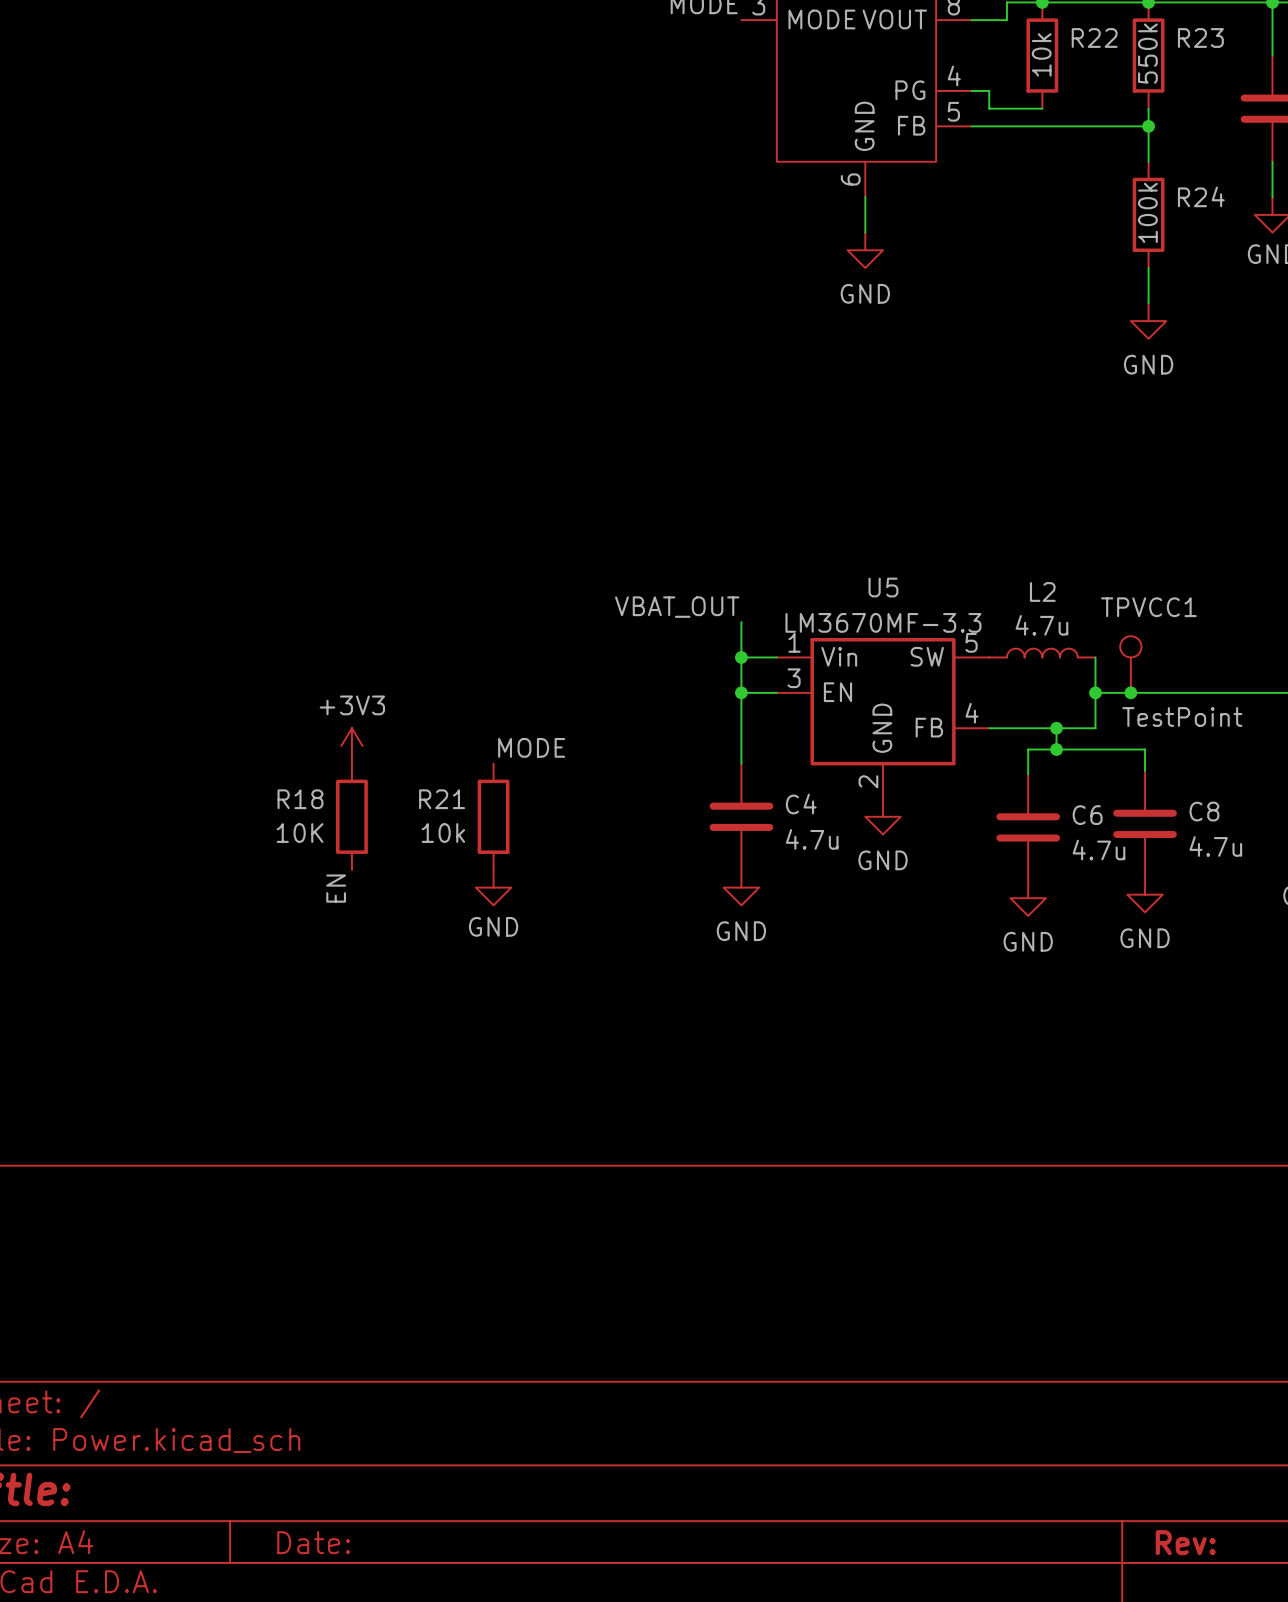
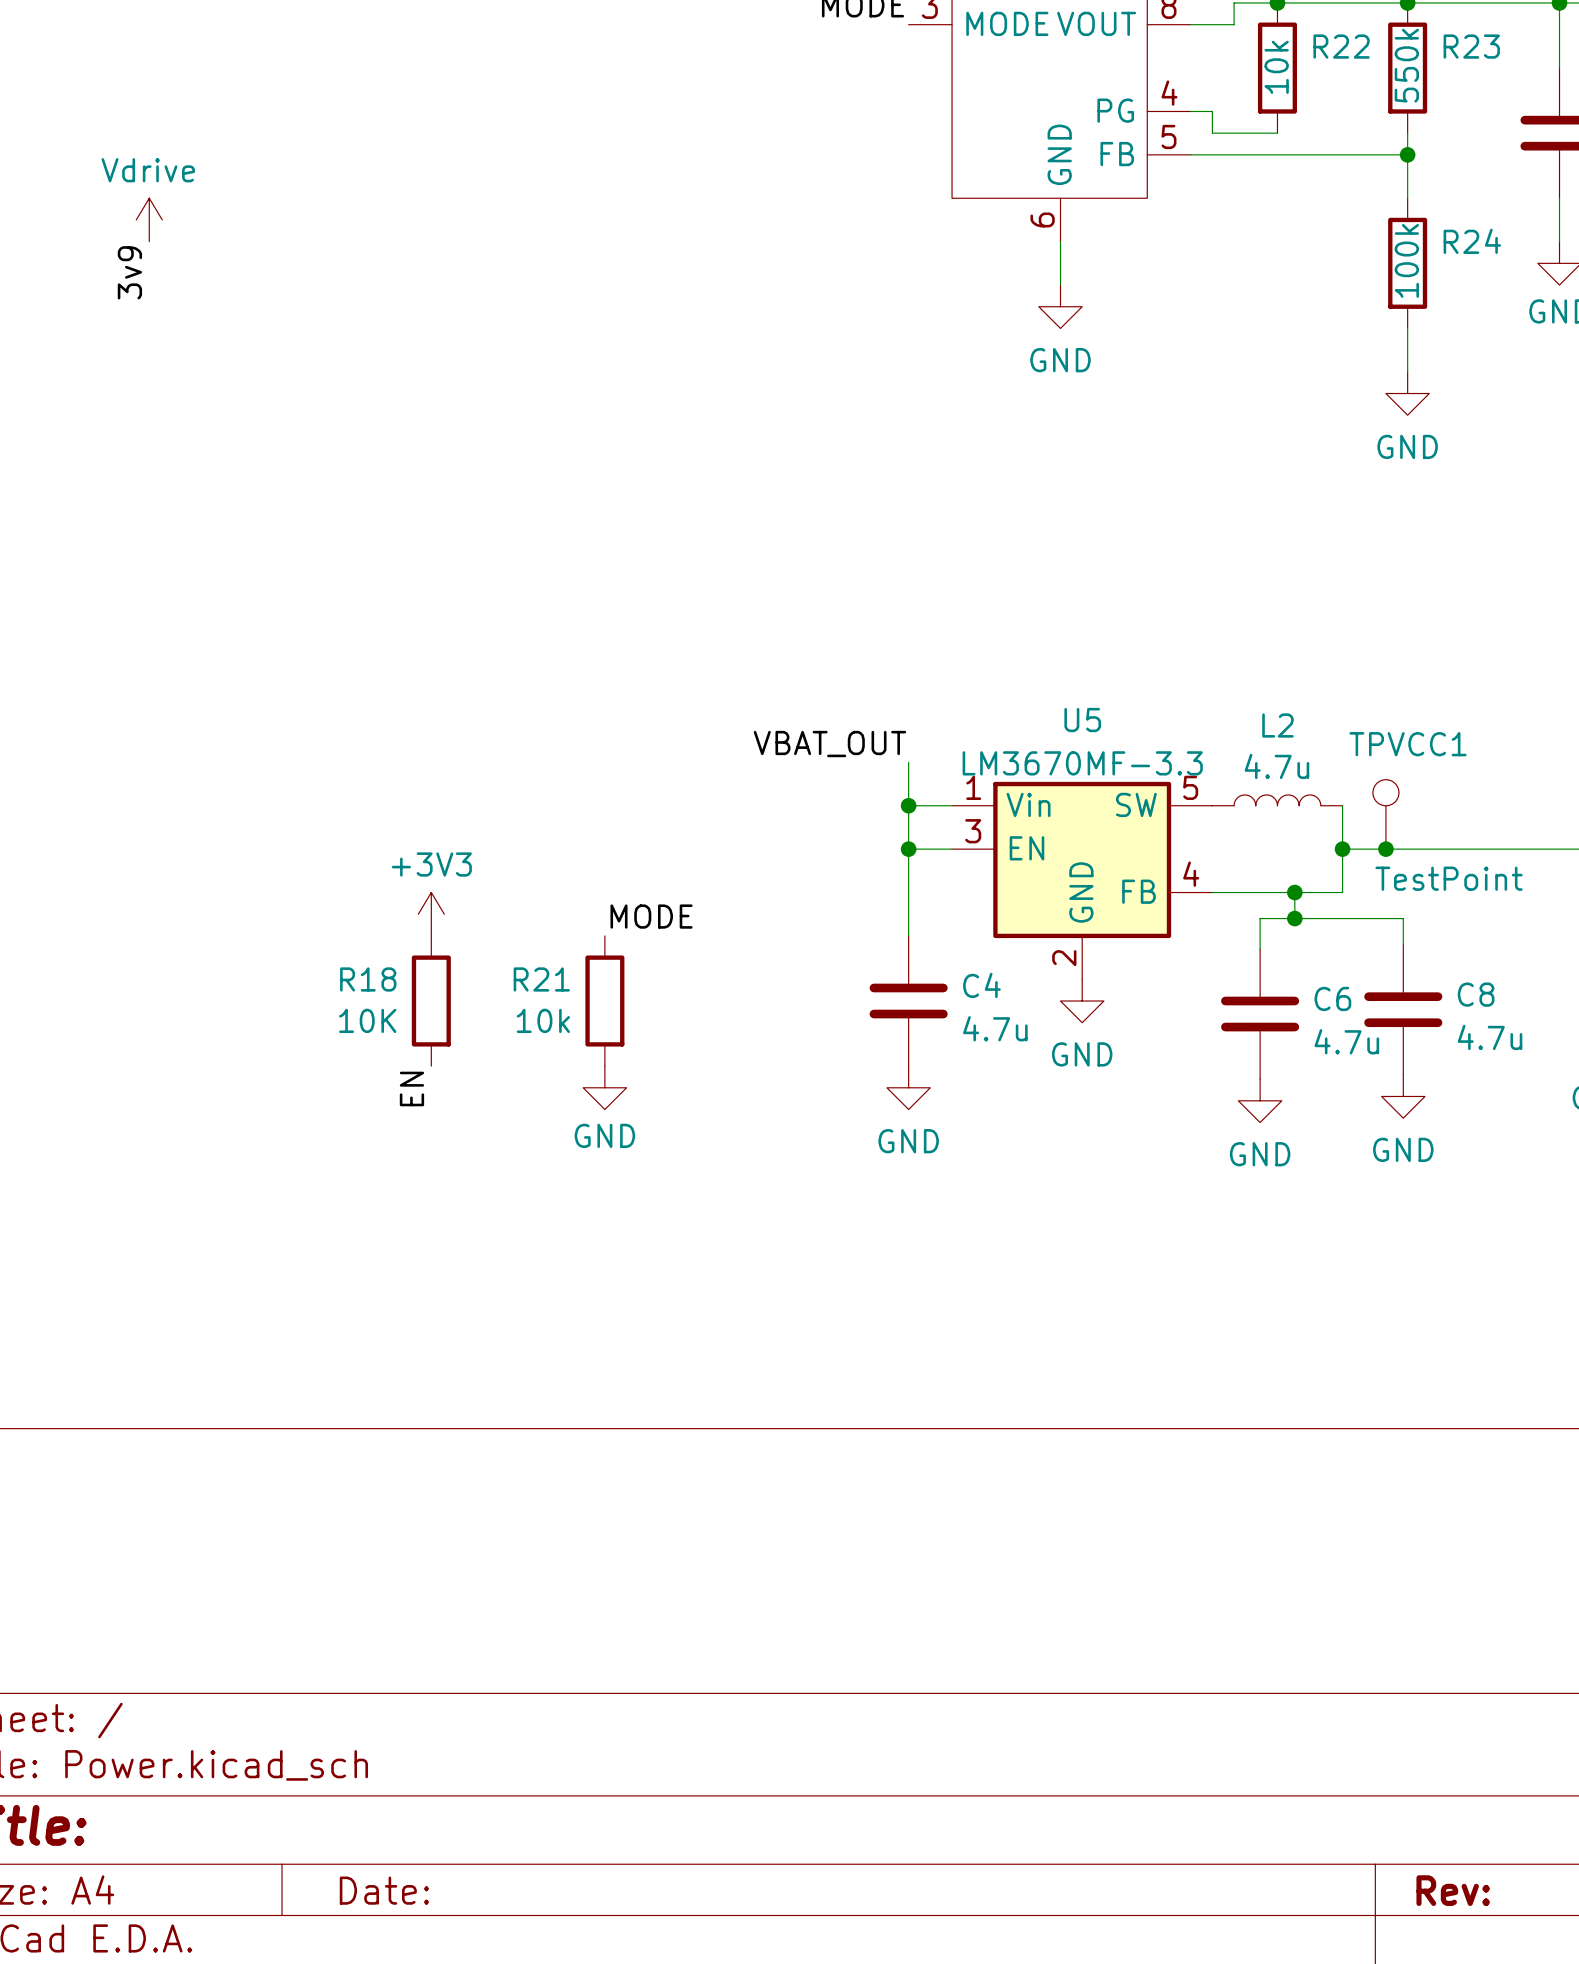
power symbol: none -> Vdrive (149, 219)
label: none -> 3v9 (129, 272)

